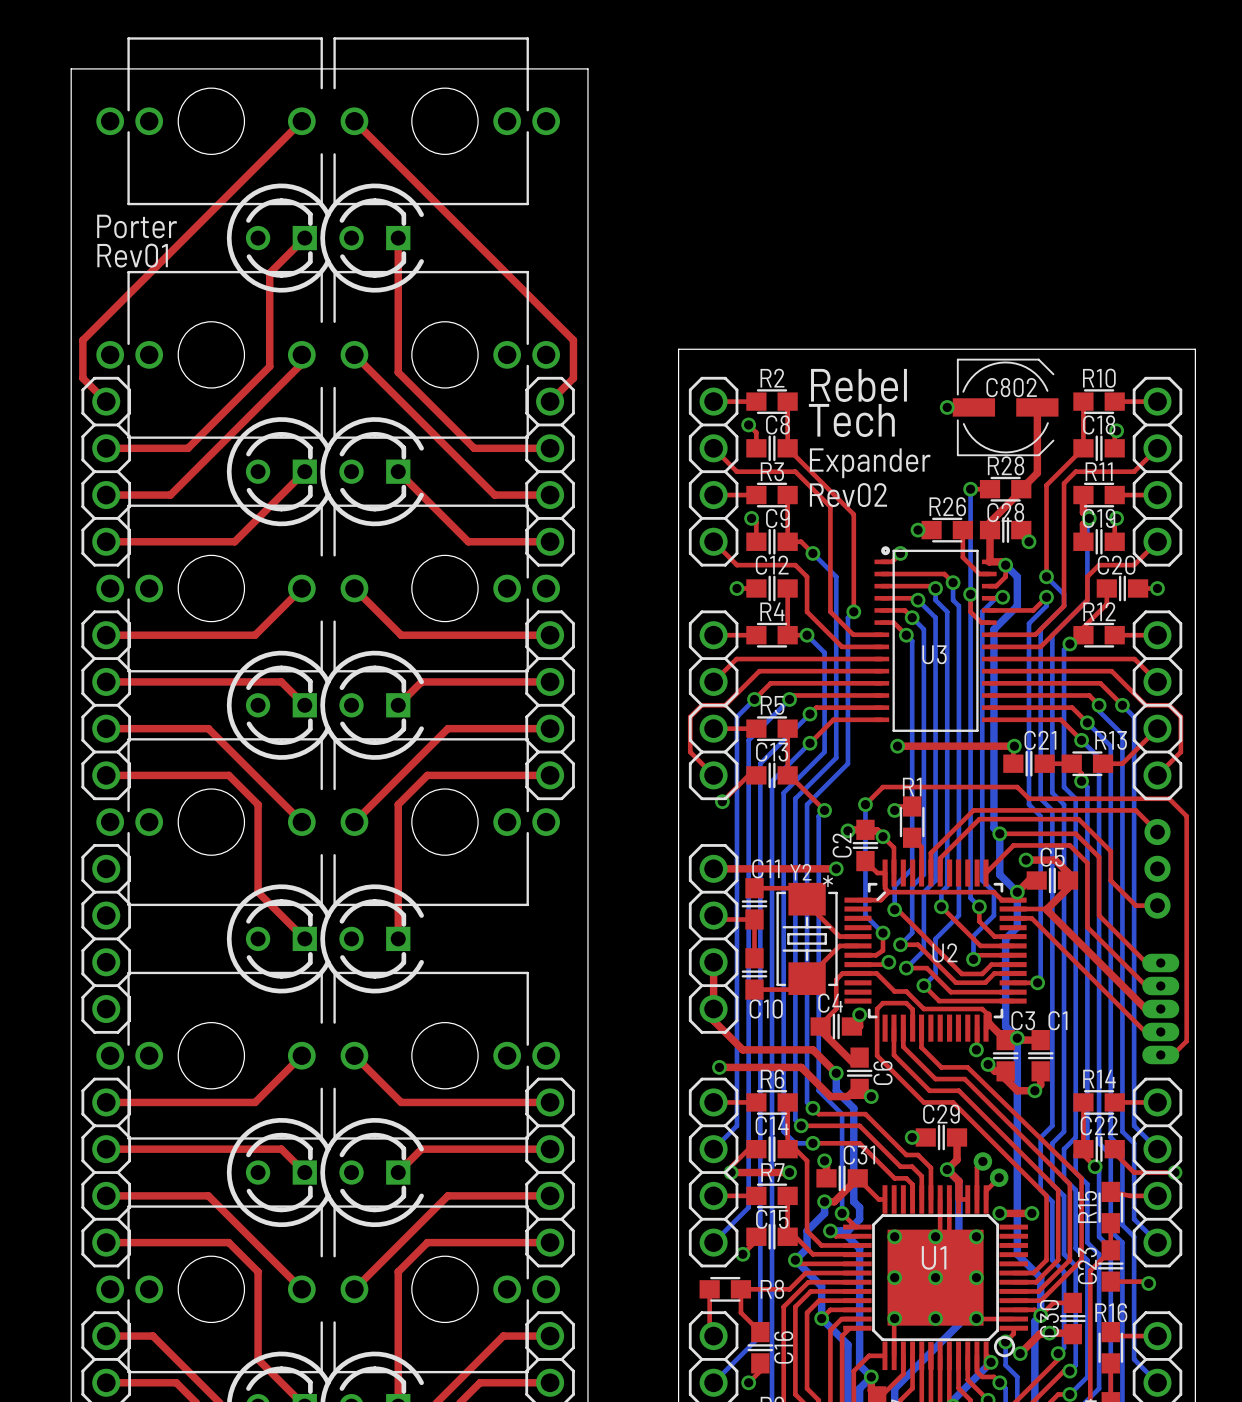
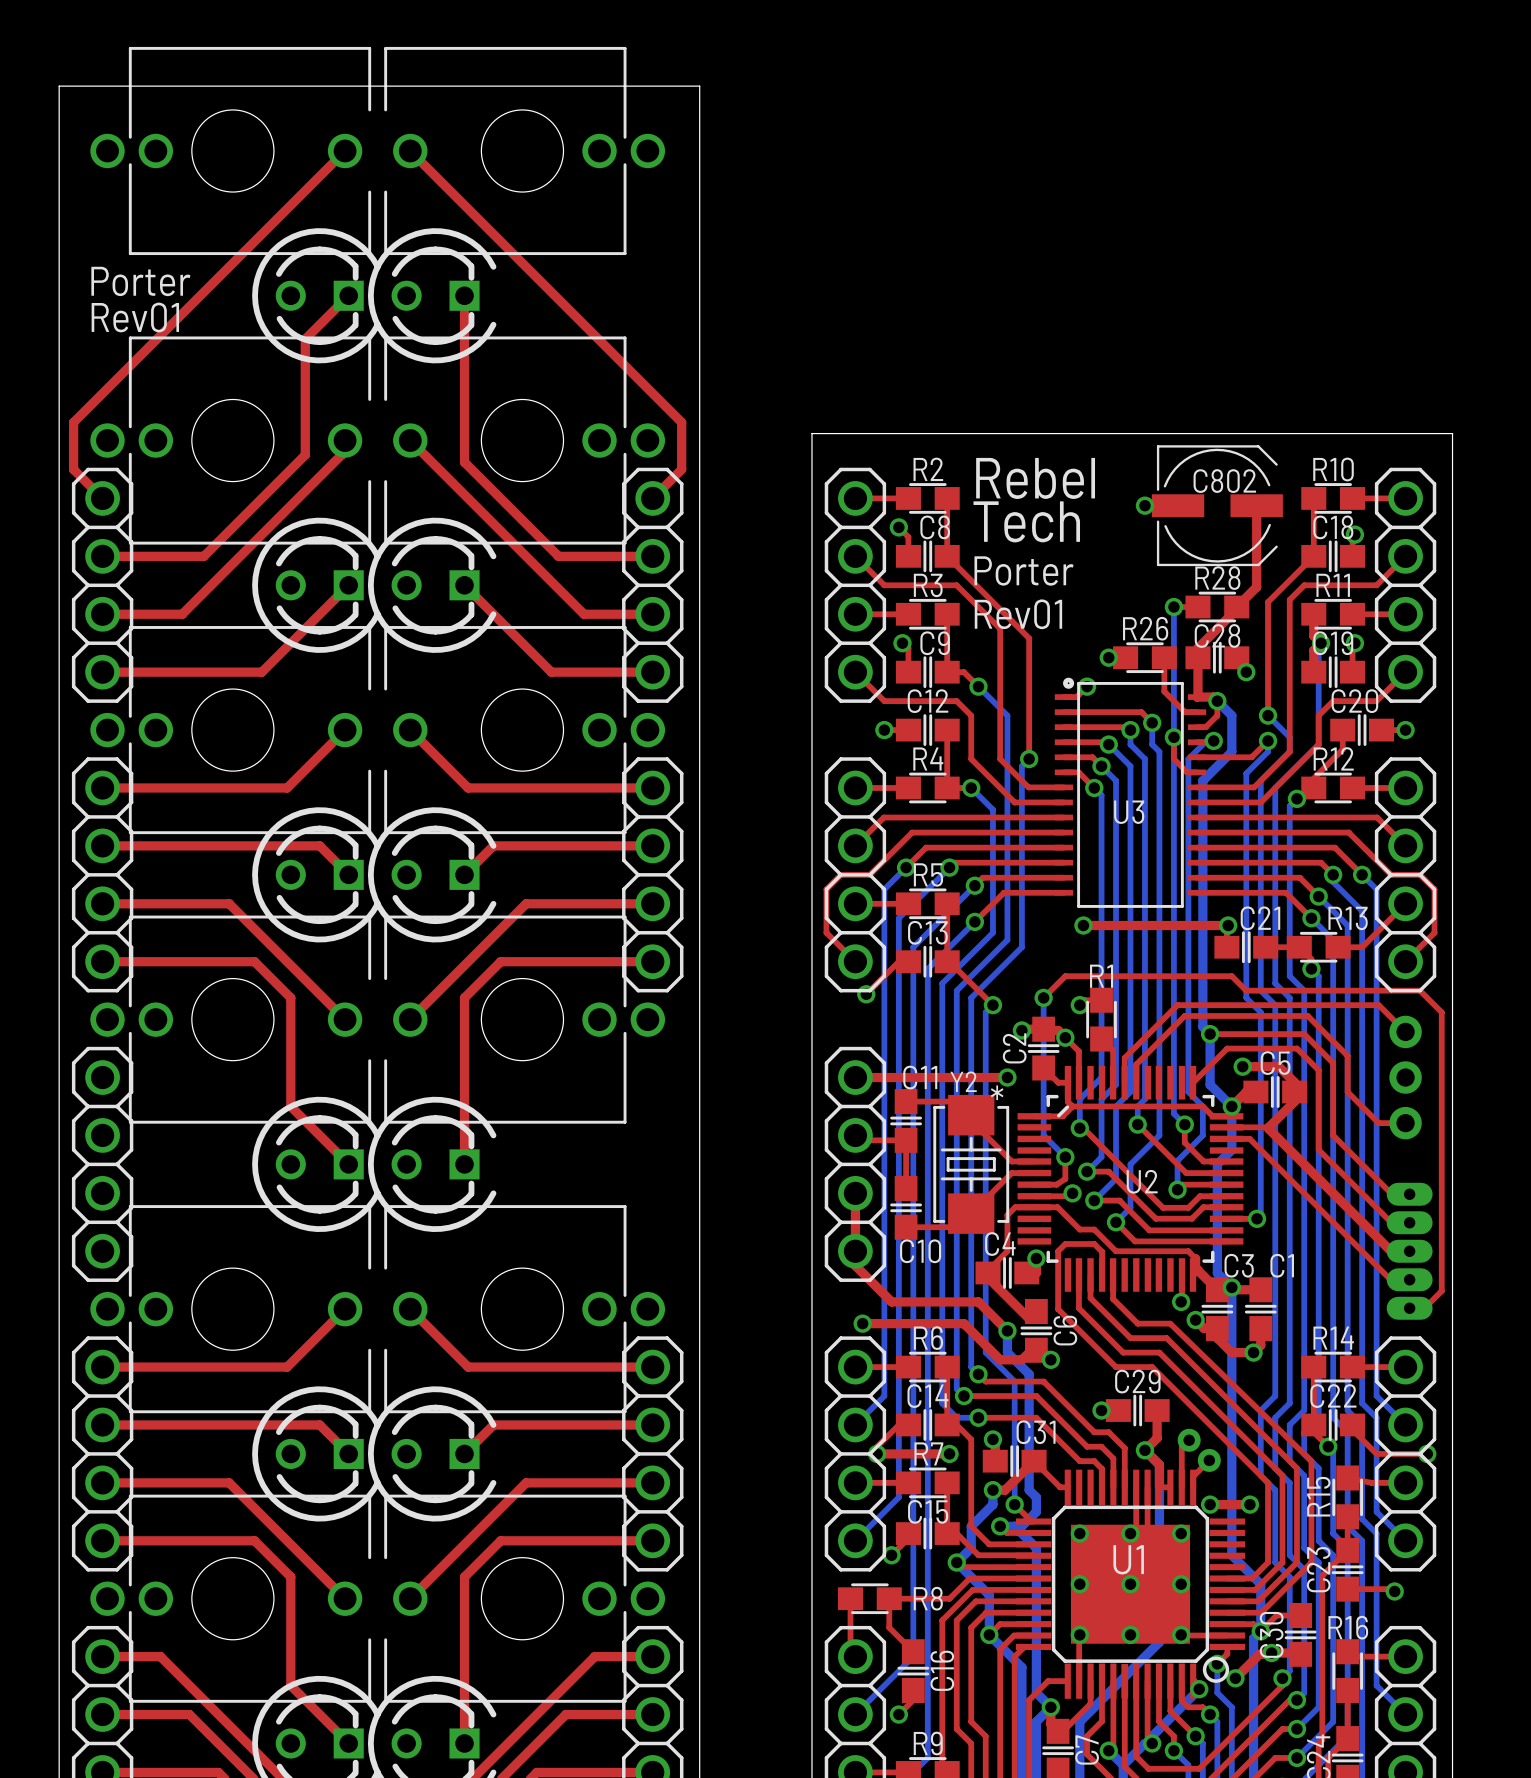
text: Expander (870, 463) -> Porter (1023, 570)
text: Rev02 (848, 495) -> Rev01 (1018, 614)

